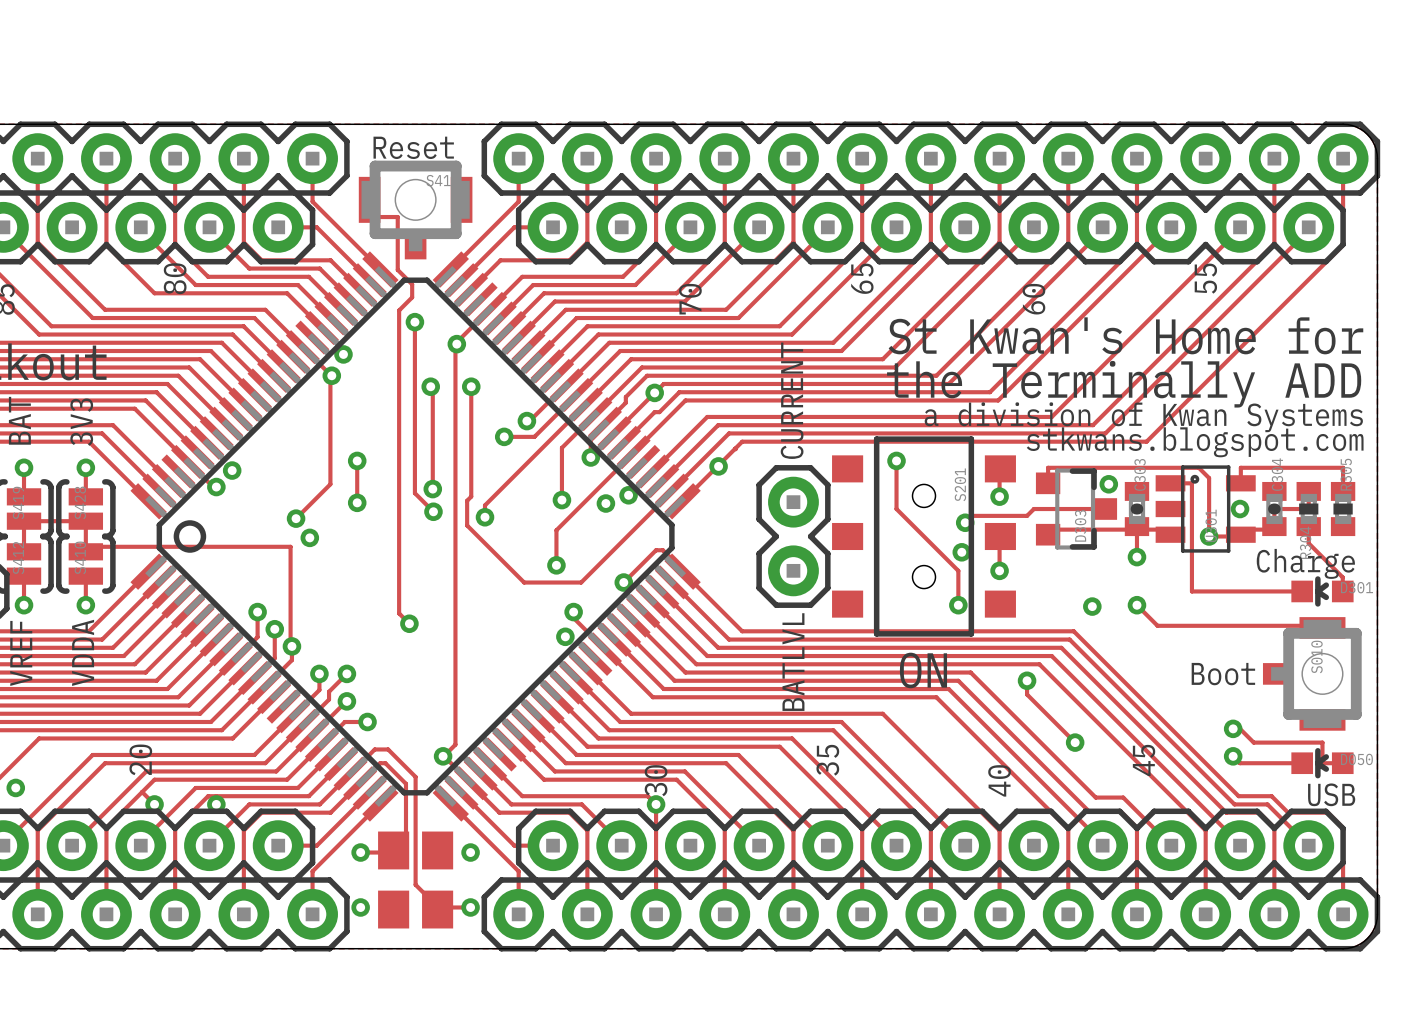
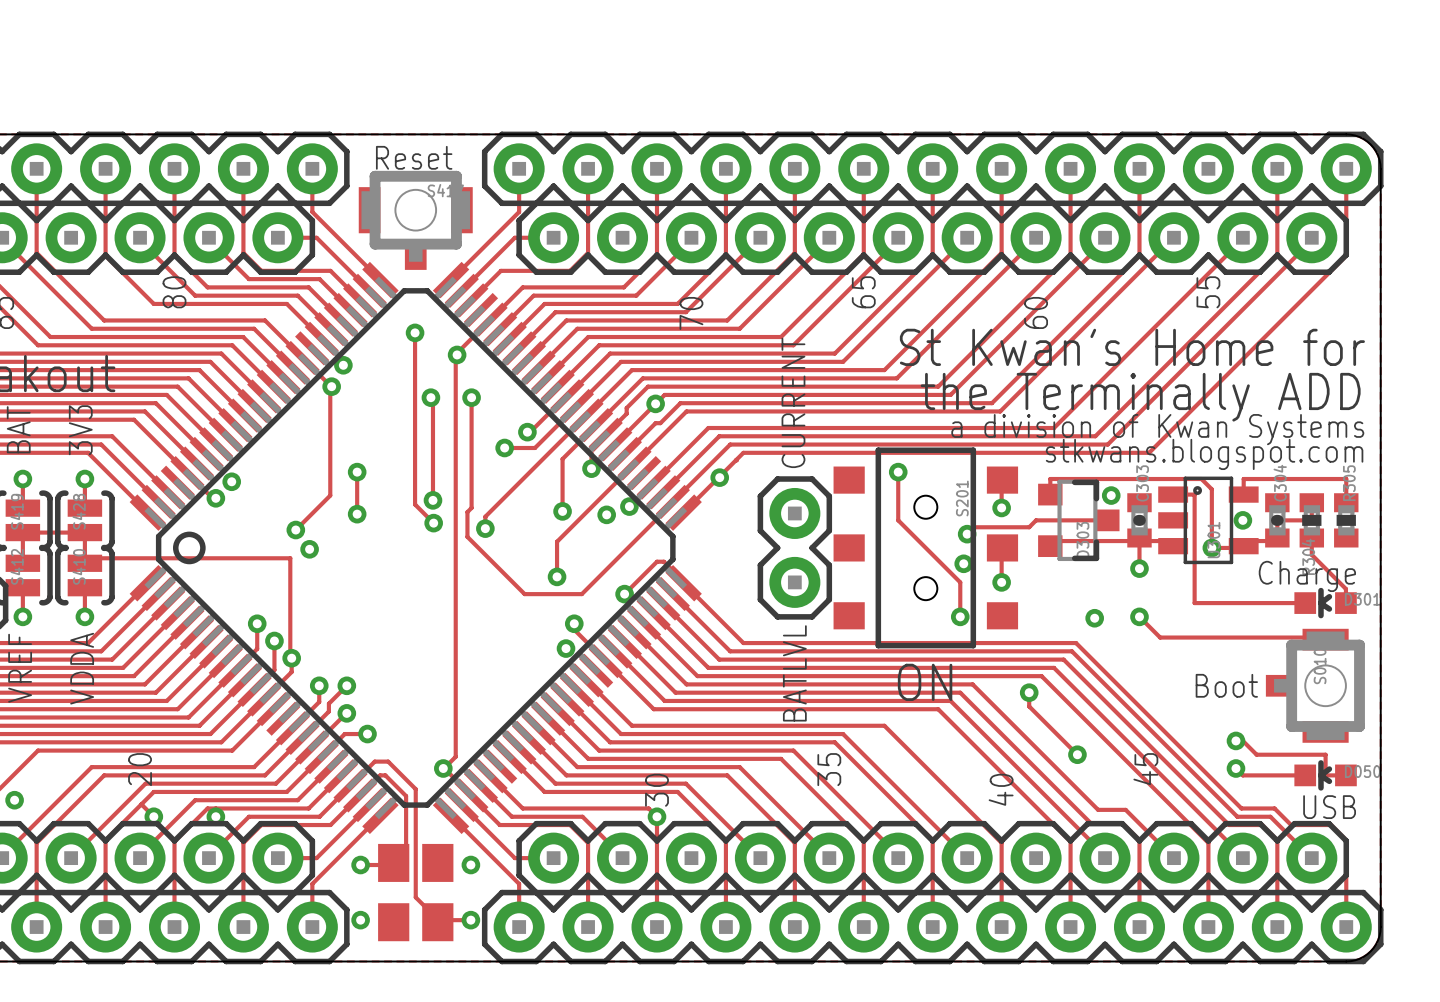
track: (370, 199) (369, 217) (397, 217) (397, 269) (412, 284) (412, 297) (399, 310) (399, 613) (409, 623) -> none
via: (409, 623) -> none

